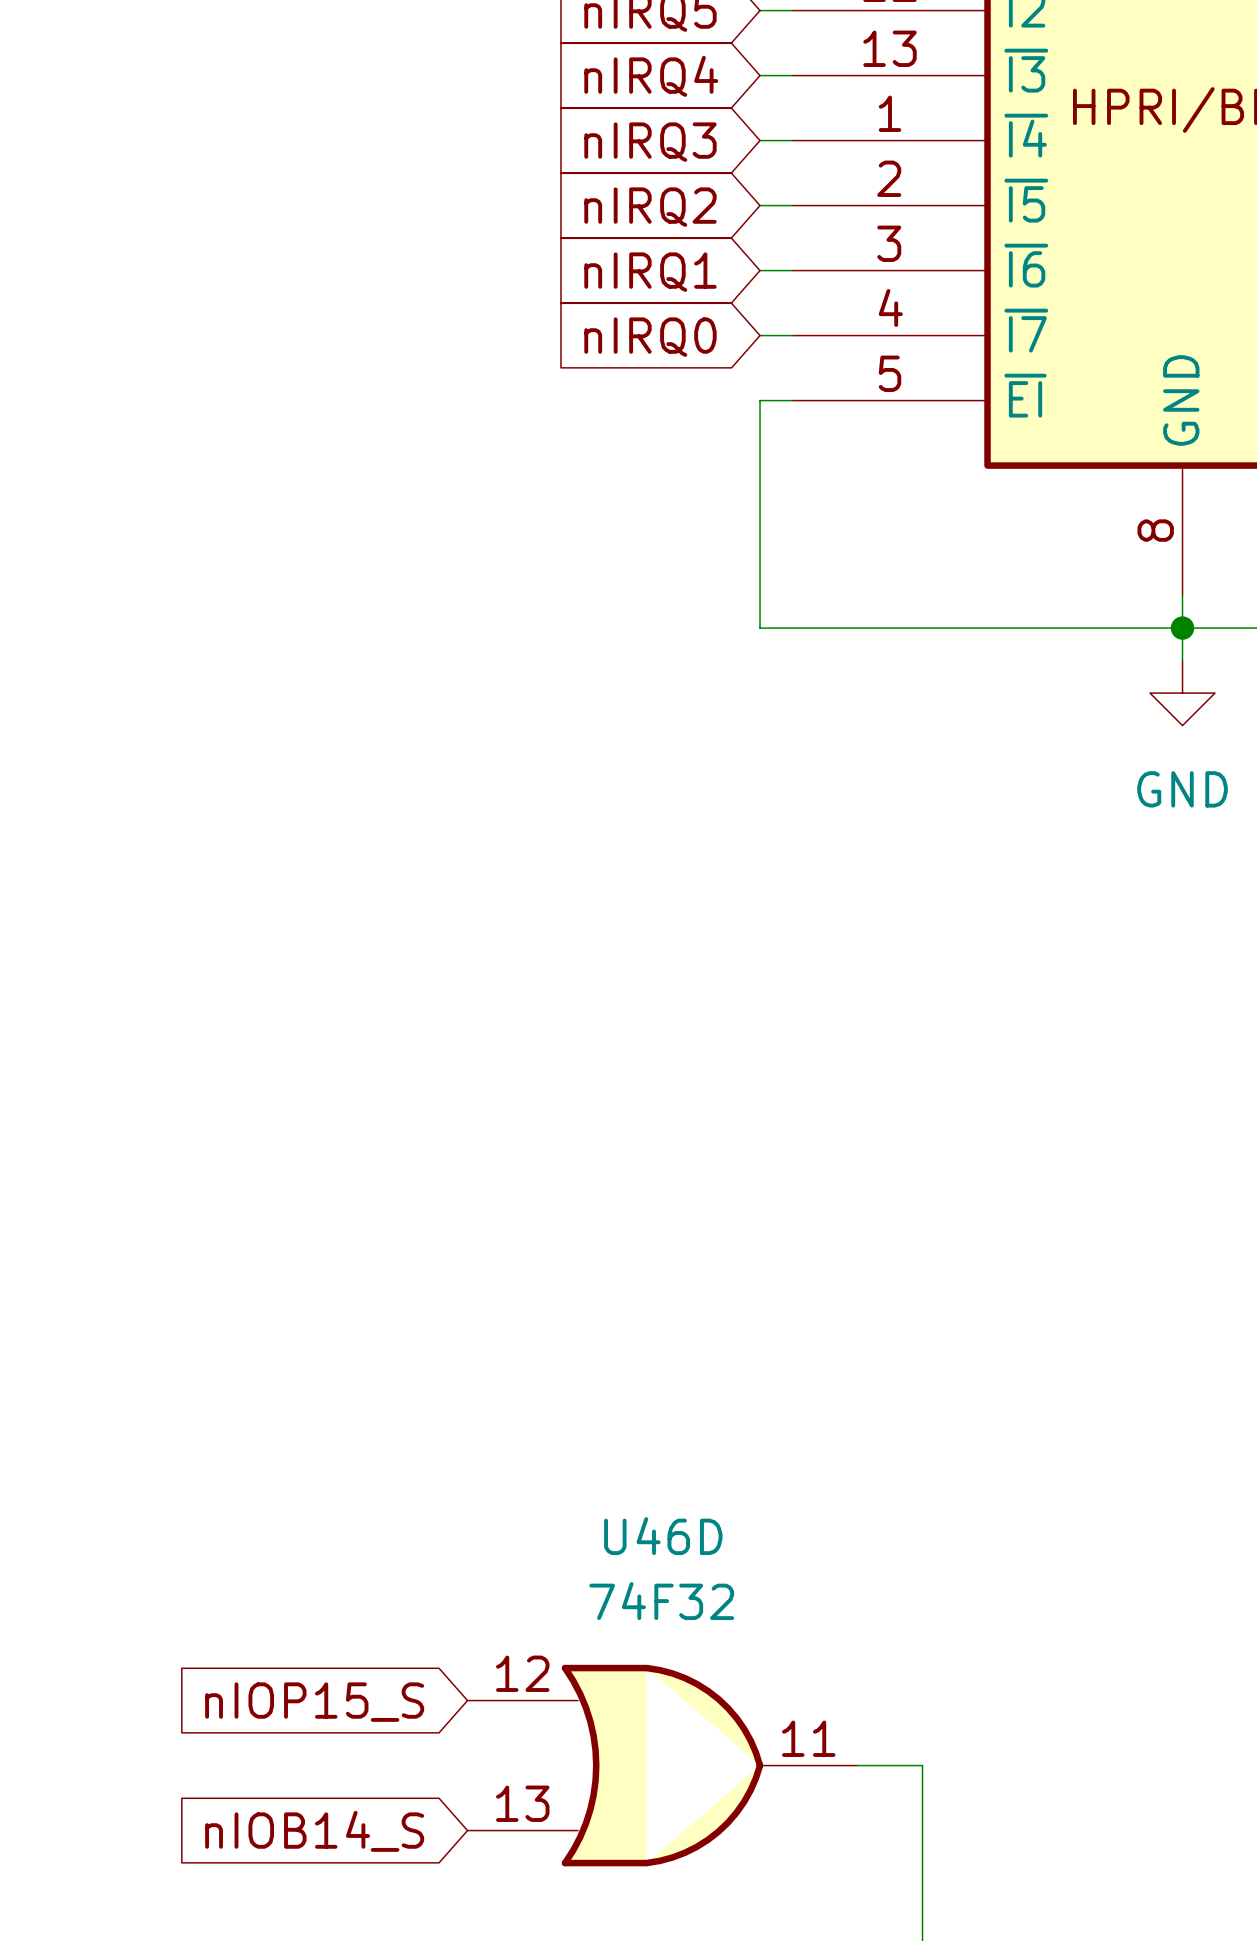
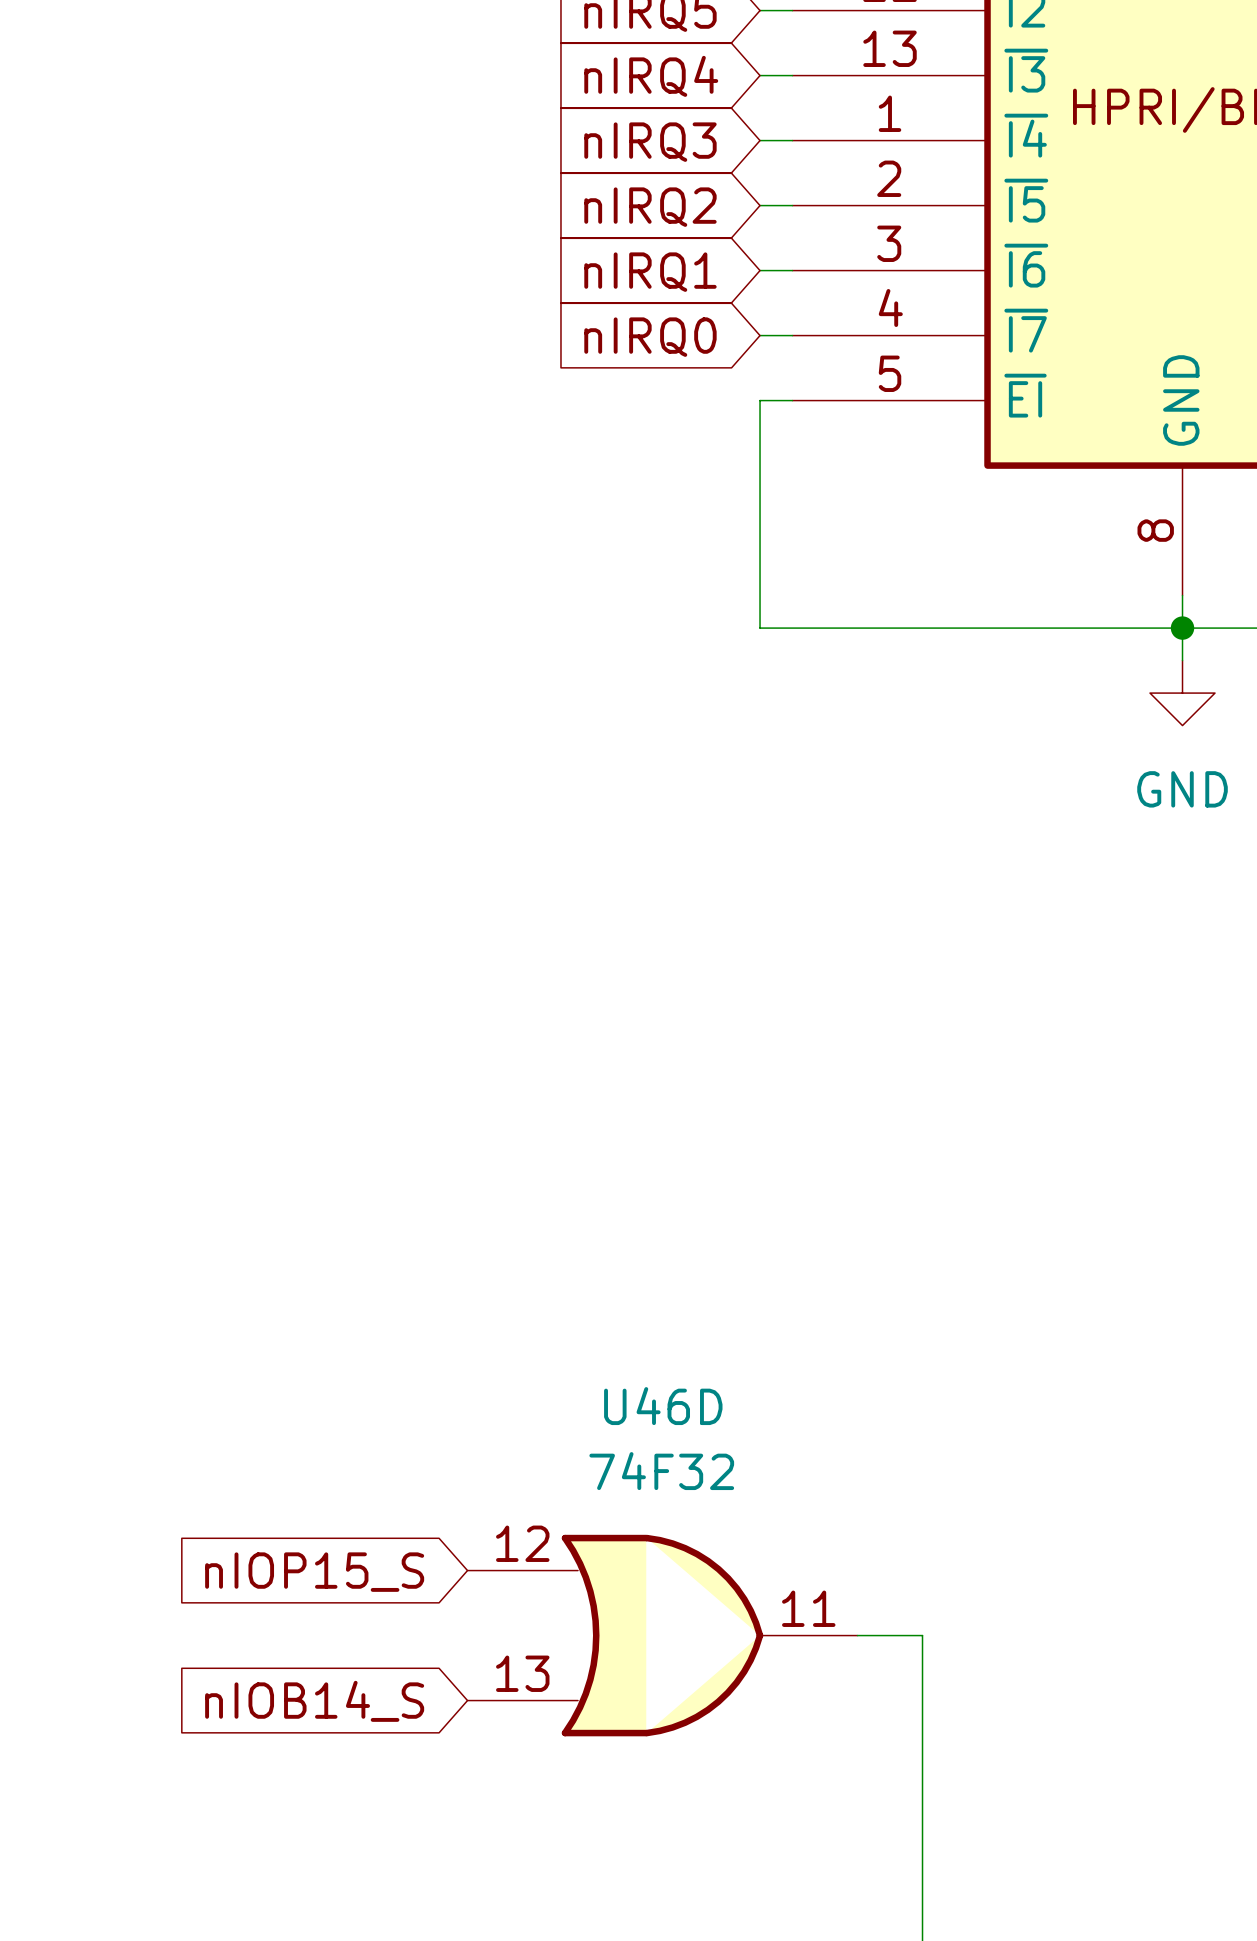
global label: none -> nIOP15_S (314, 1572)
global label: nIOP15_S (314, 1702) -> nIOB14_S (314, 1701)
U46D position: (662, 1765) -> (662, 1635)
wire: (857, 1765) (922, 1765) -> (857, 1635) (922, 1635) (922, 1765)
global label: nIOB14_S (314, 1831) -> none

